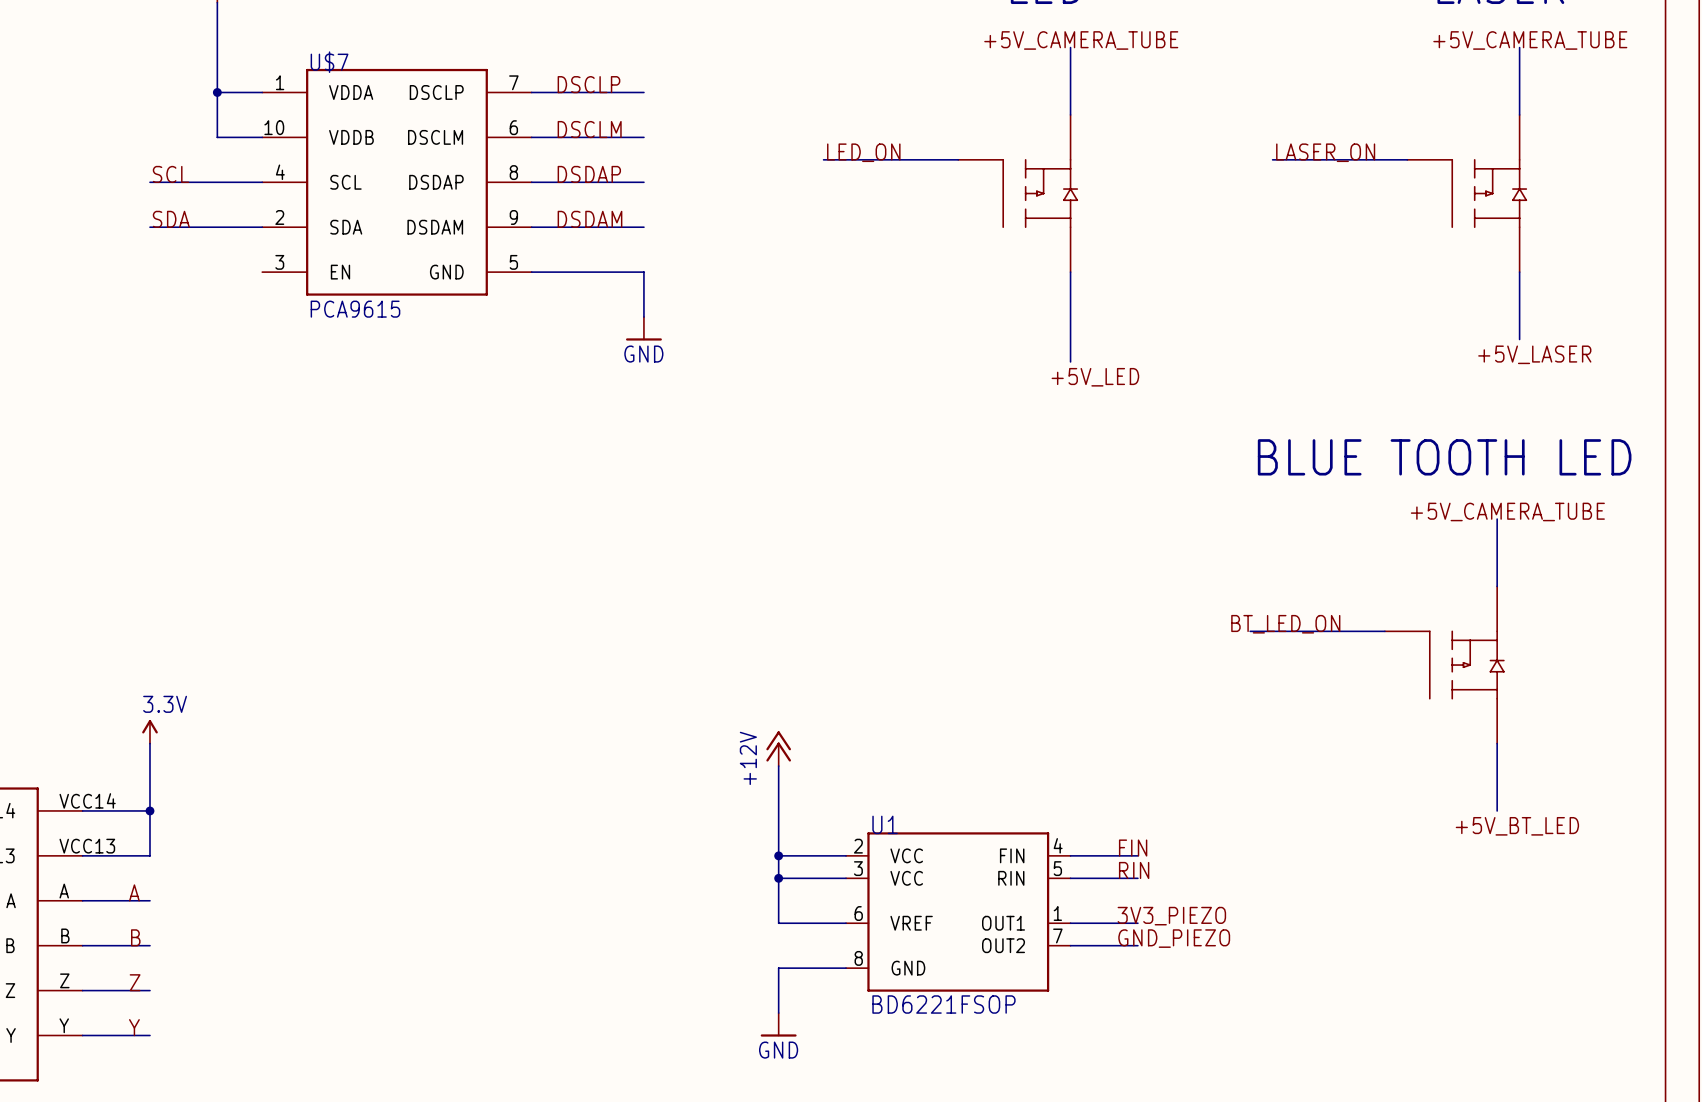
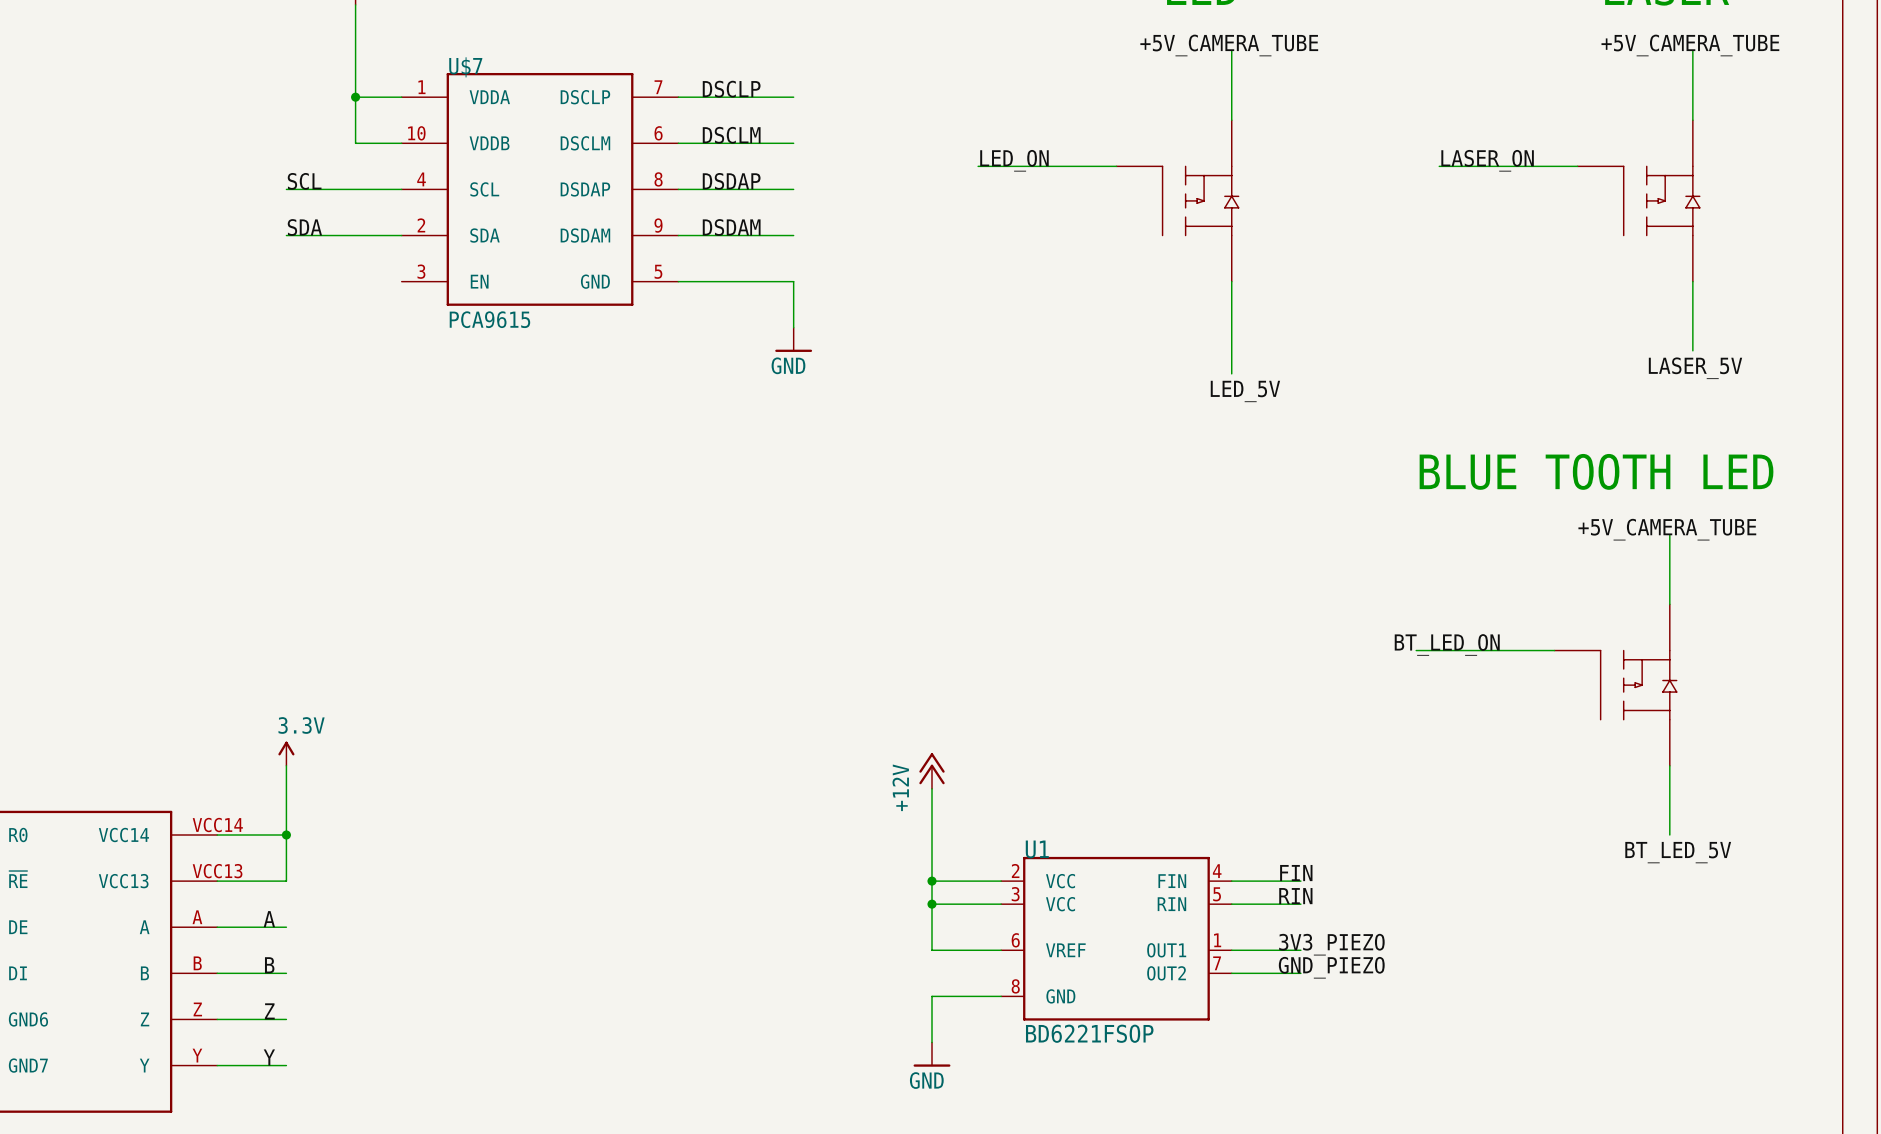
label: +5V_LASER (1534, 354) -> LASER_5V (1695, 368)
label: +5V_LED (1095, 377) -> LED_5V (1245, 391)
label: +5V_BT_LED (1517, 826) -> BT_LED_5V (1678, 852)

